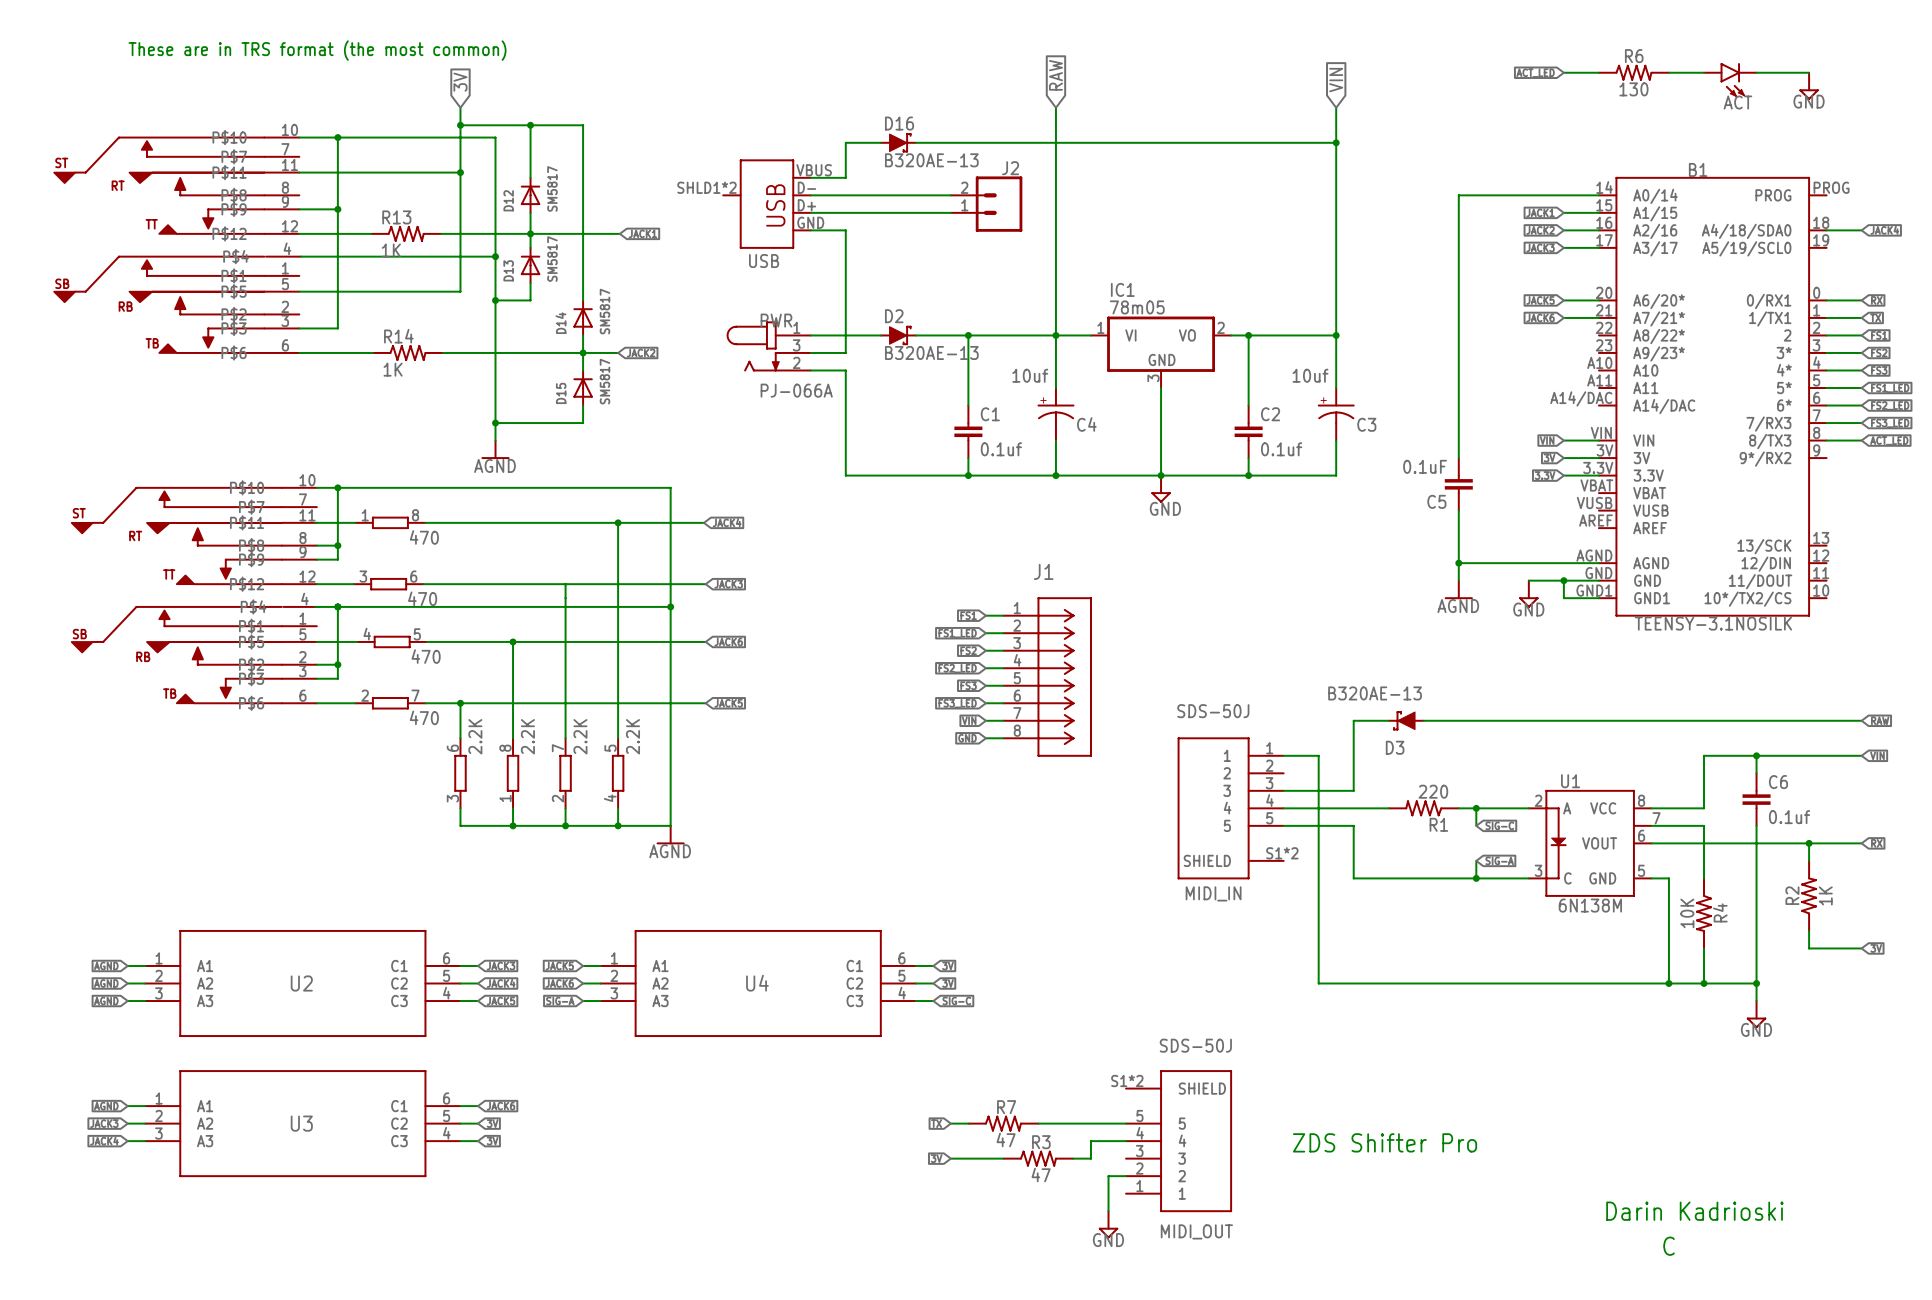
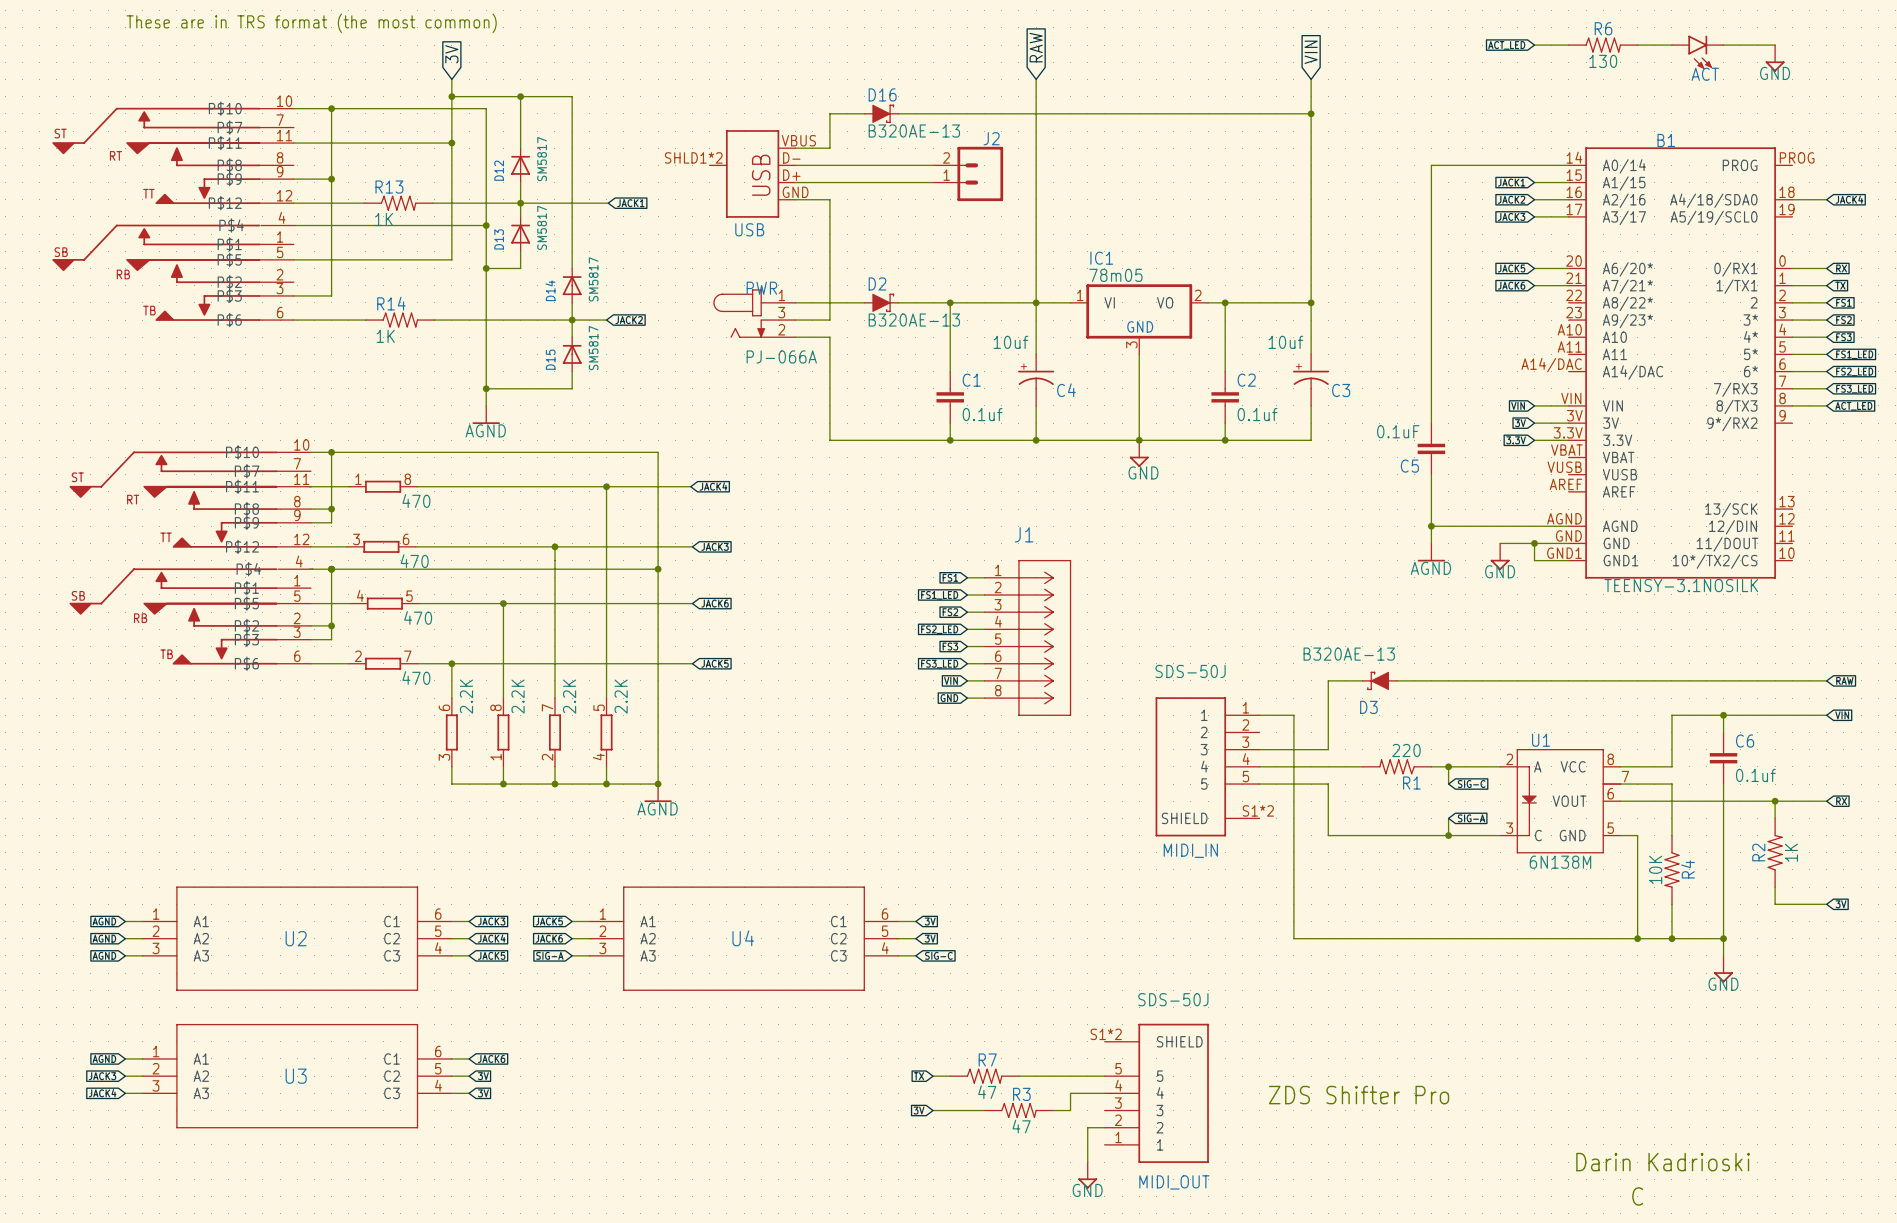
junction: none -> (554, 546)
junction: none -> (658, 784)

